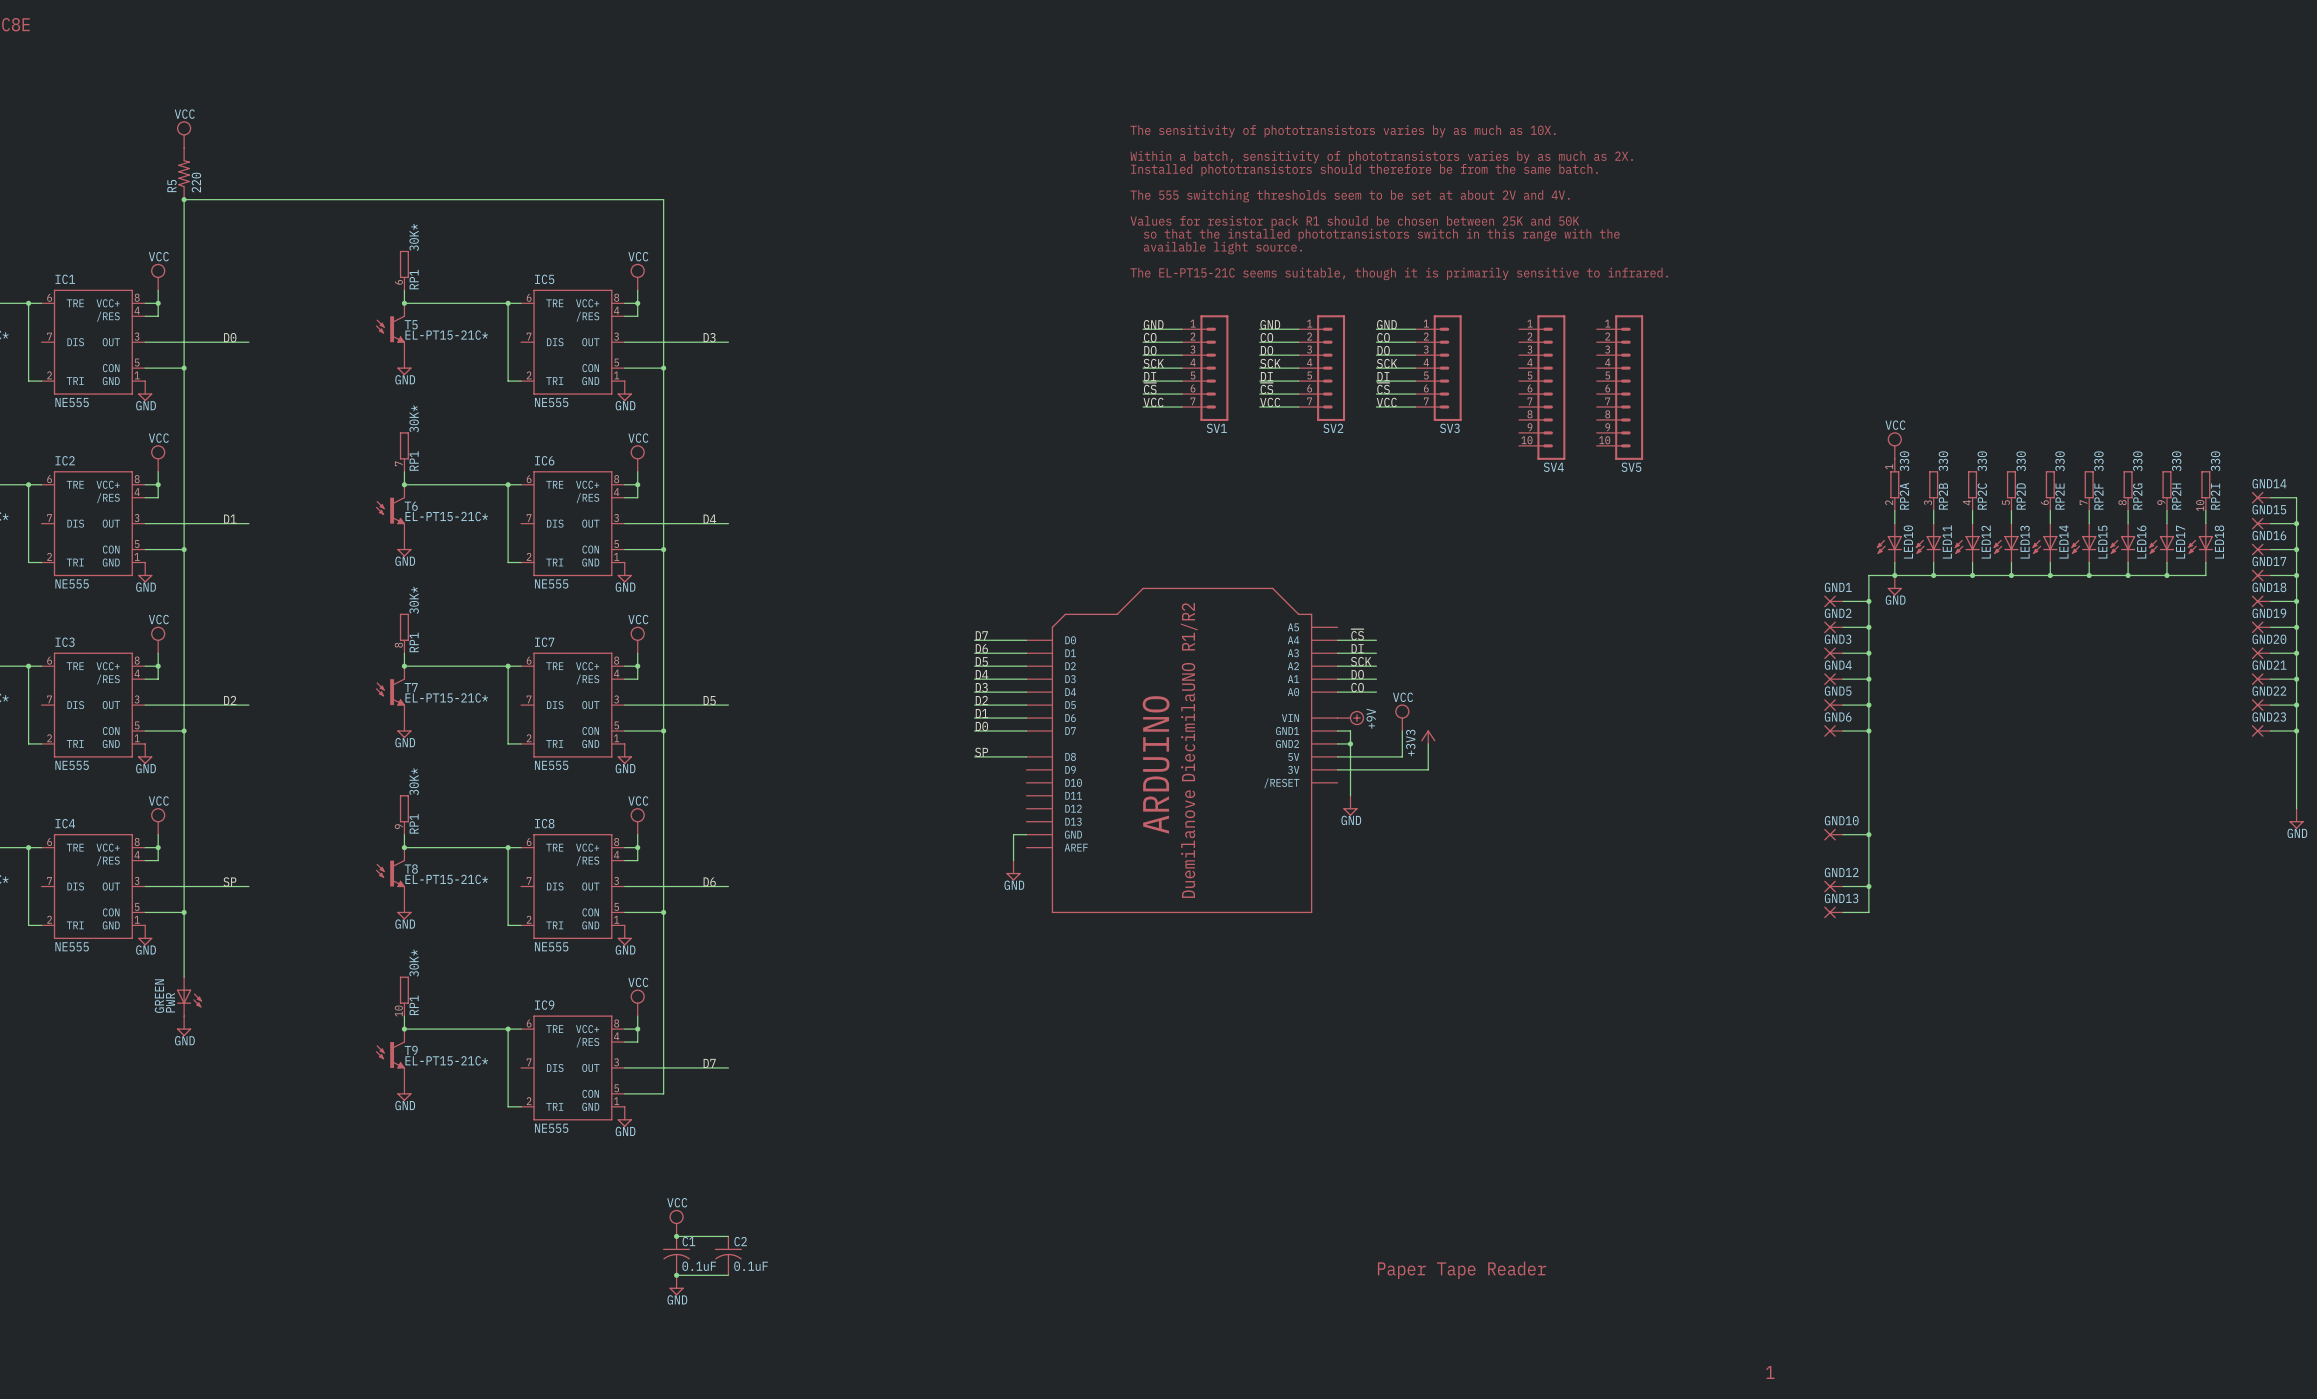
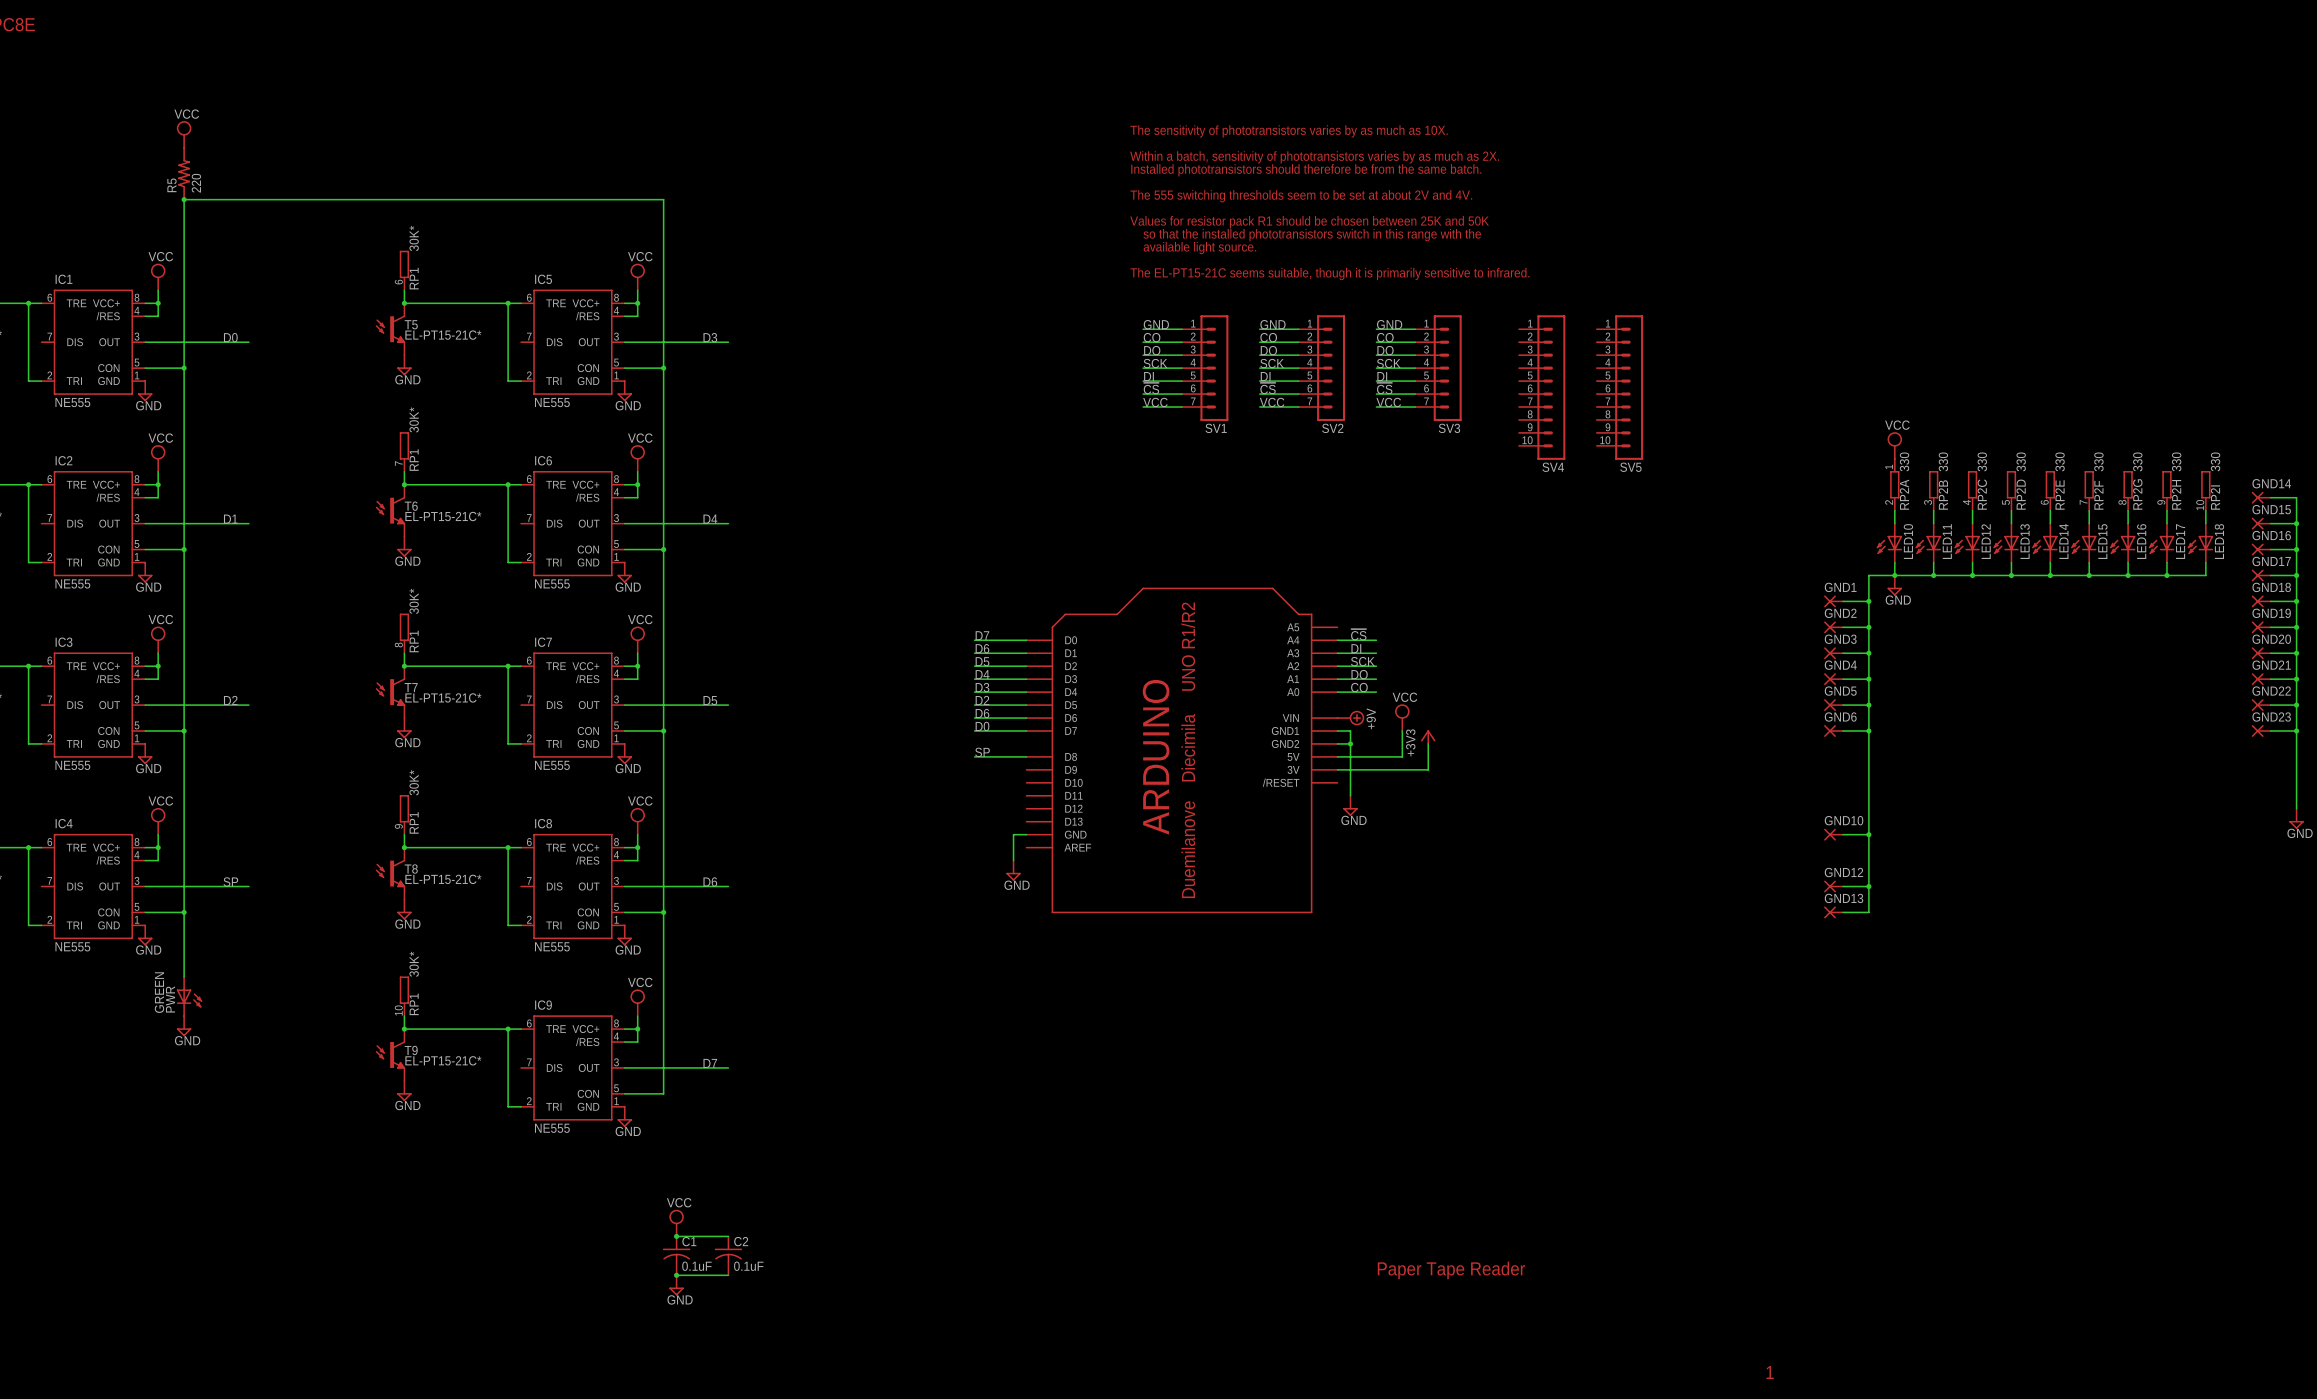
label: D1 (981, 713) -> D6 (982, 713)

